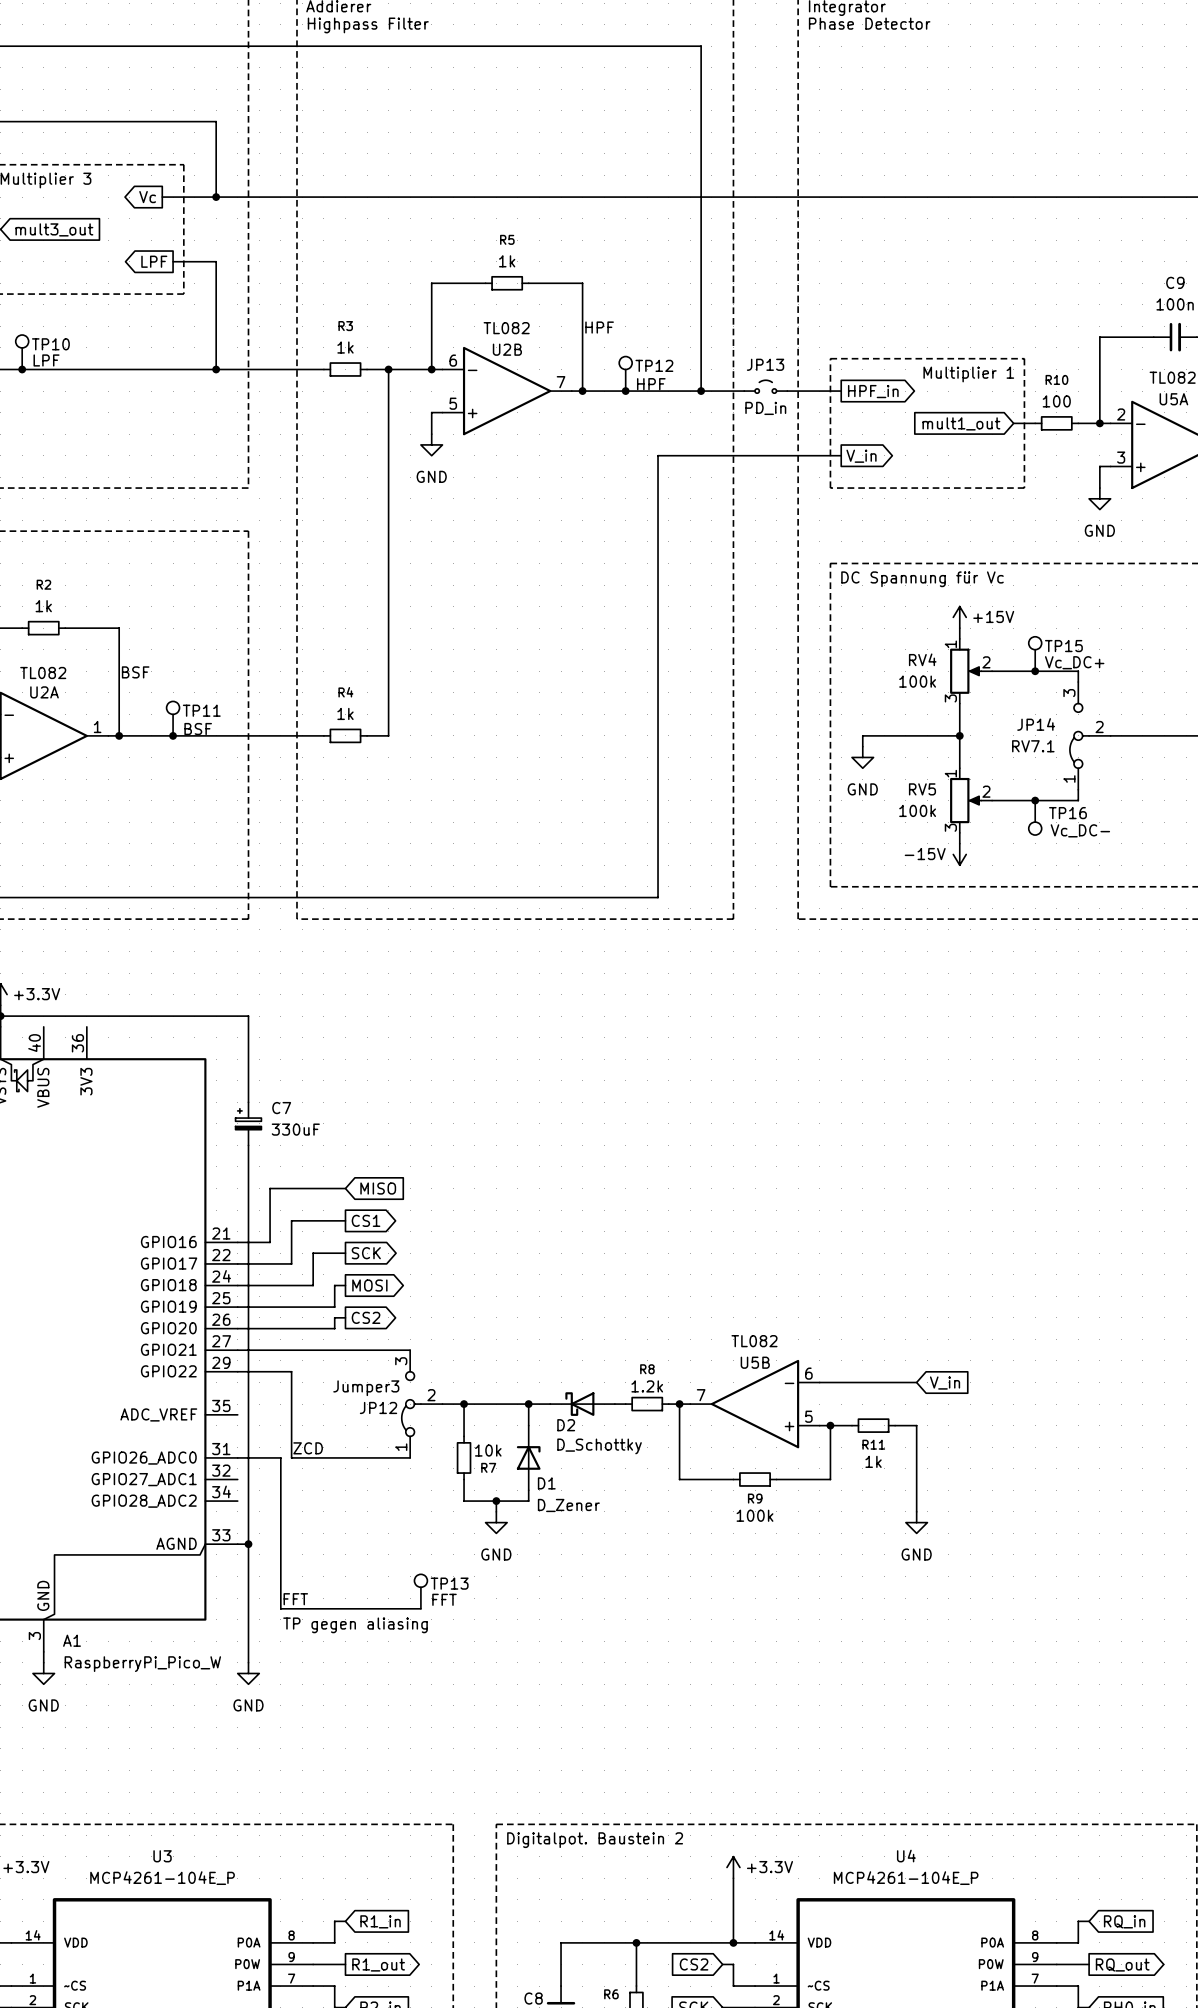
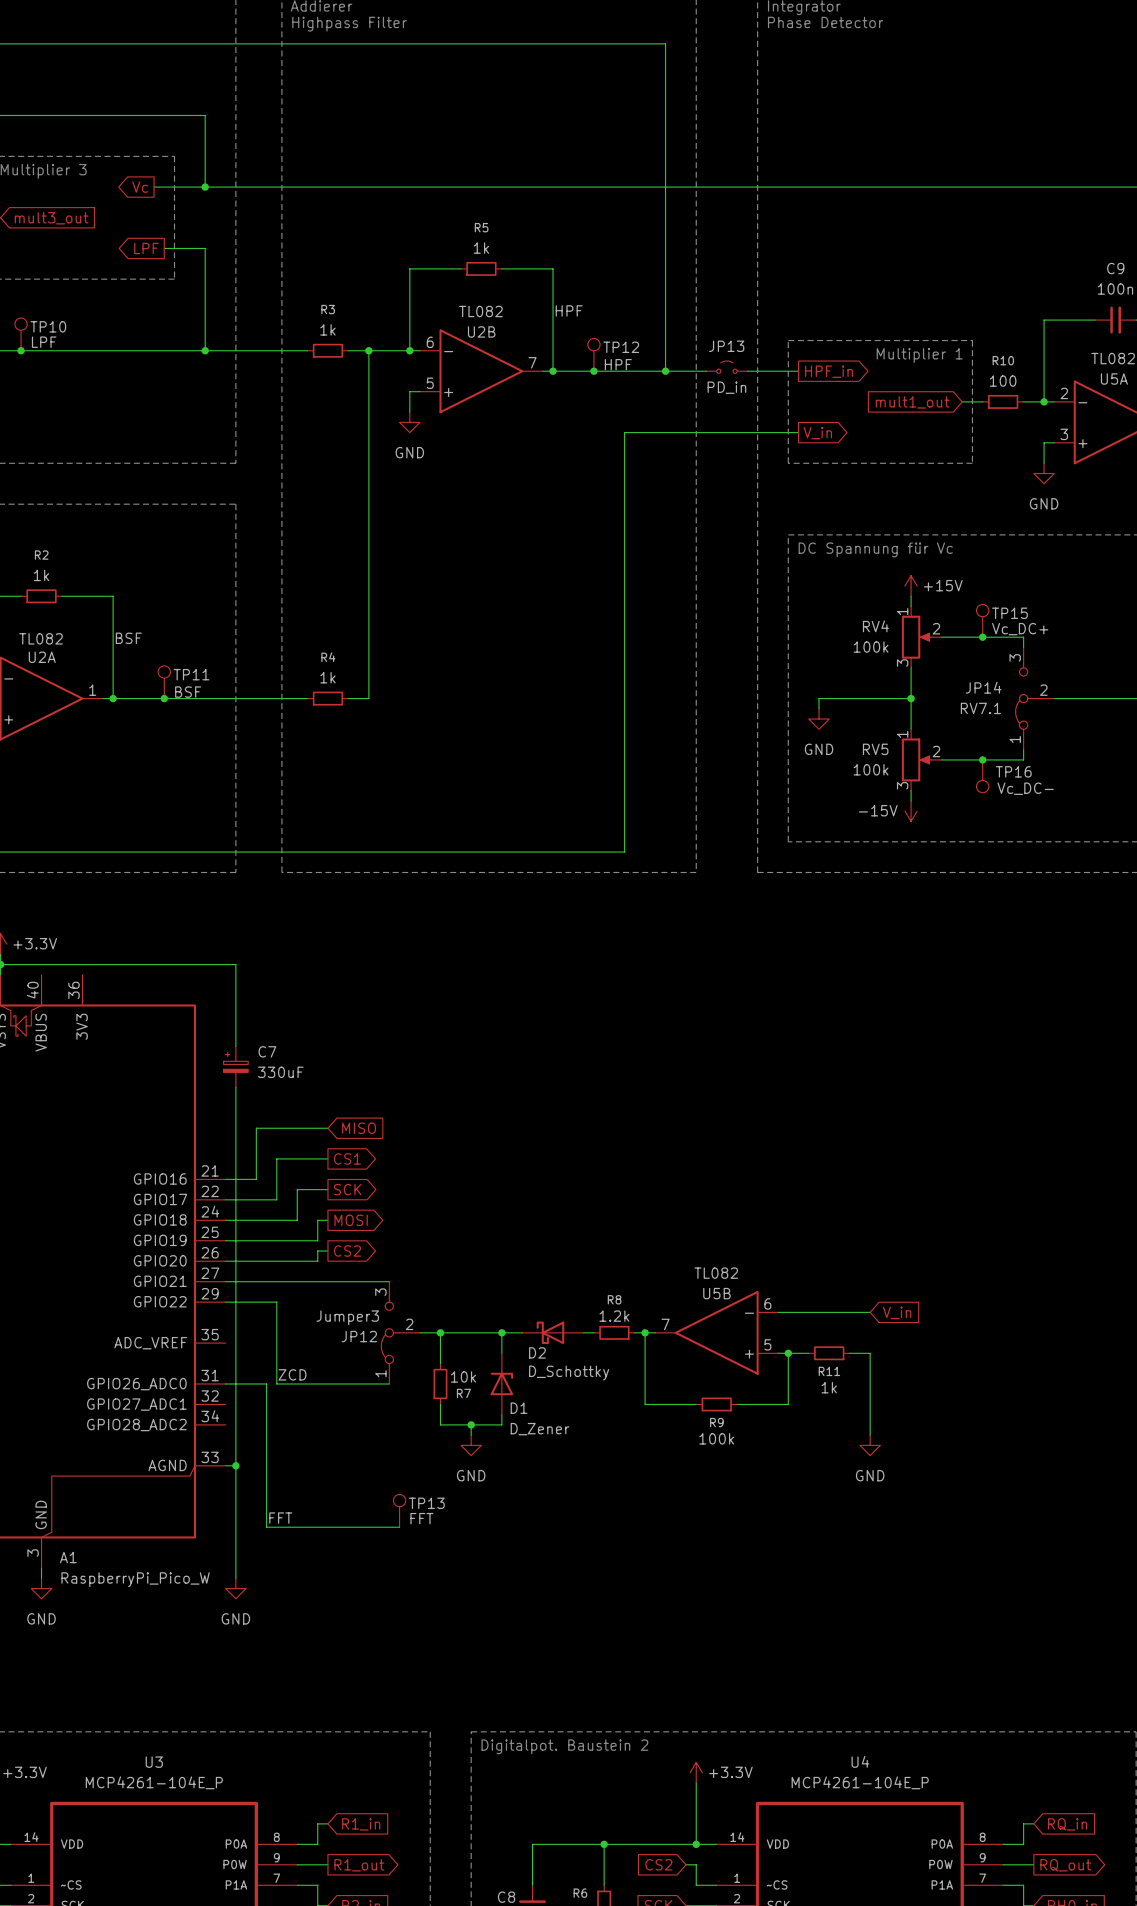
text: TP gegen aliasing (355, 1625) -> none

